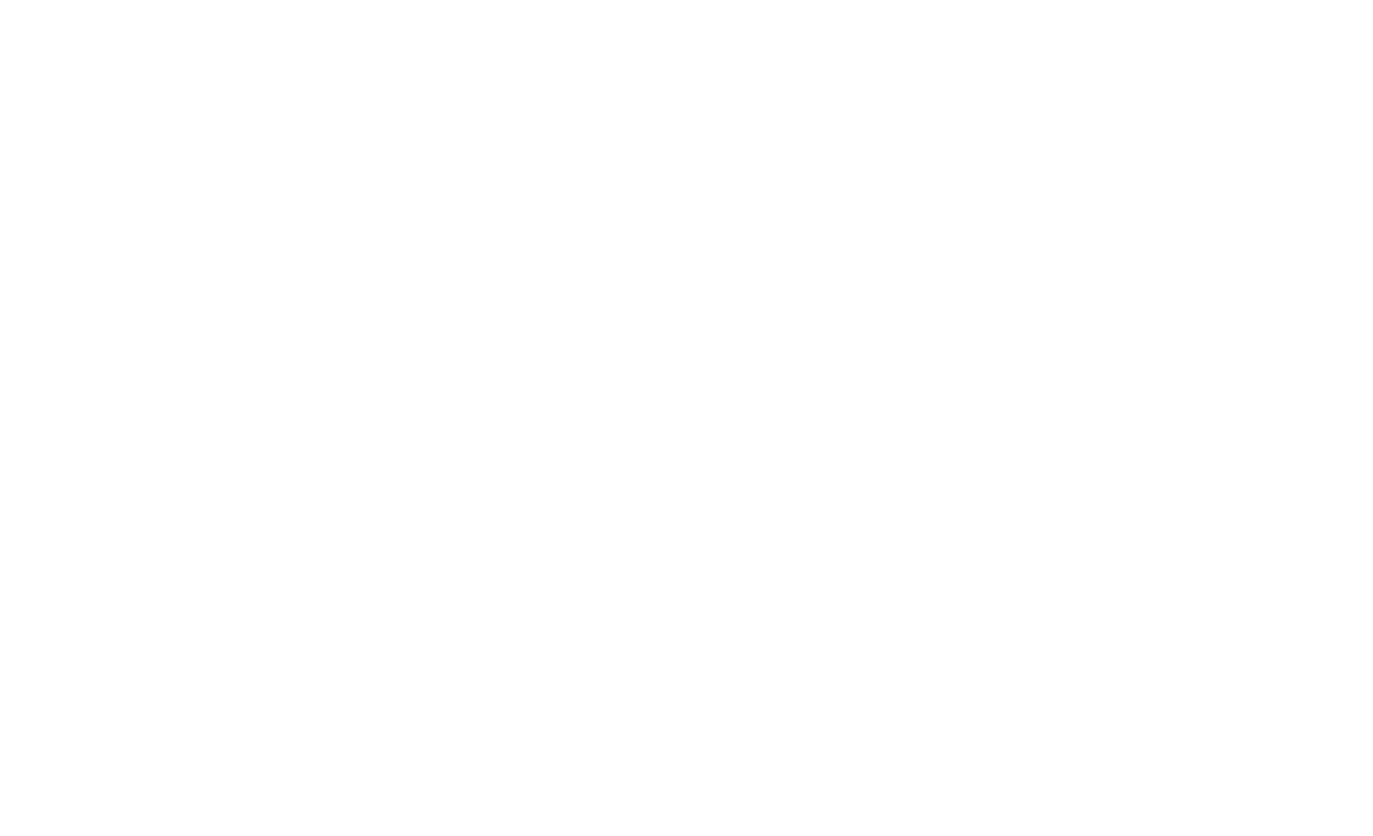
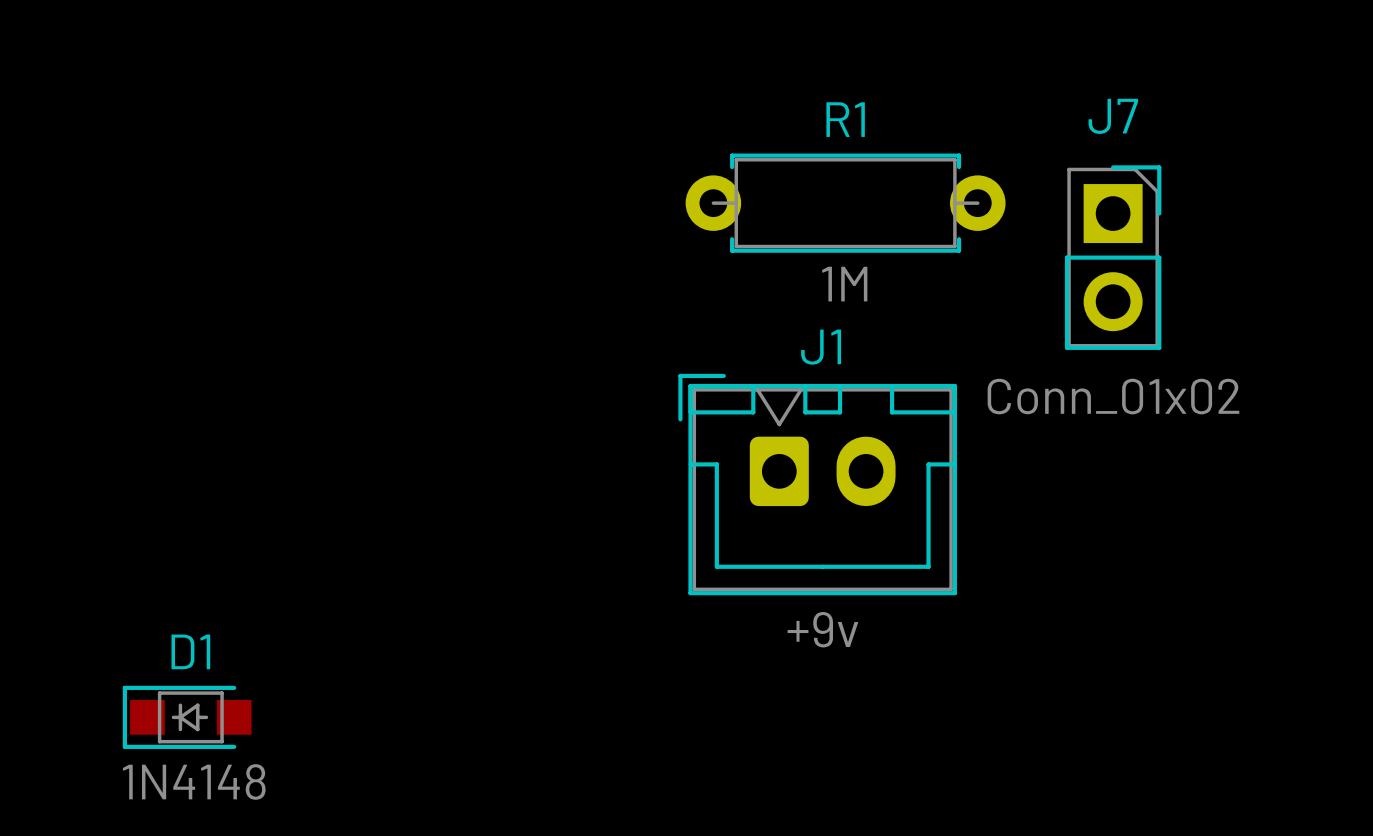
R1: none -> 1M (845, 203)
J7: none -> Conn_01x02 (1113, 257)
J1: none -> +9v (817, 484)
D1: none -> 1N4148 (187, 717)

